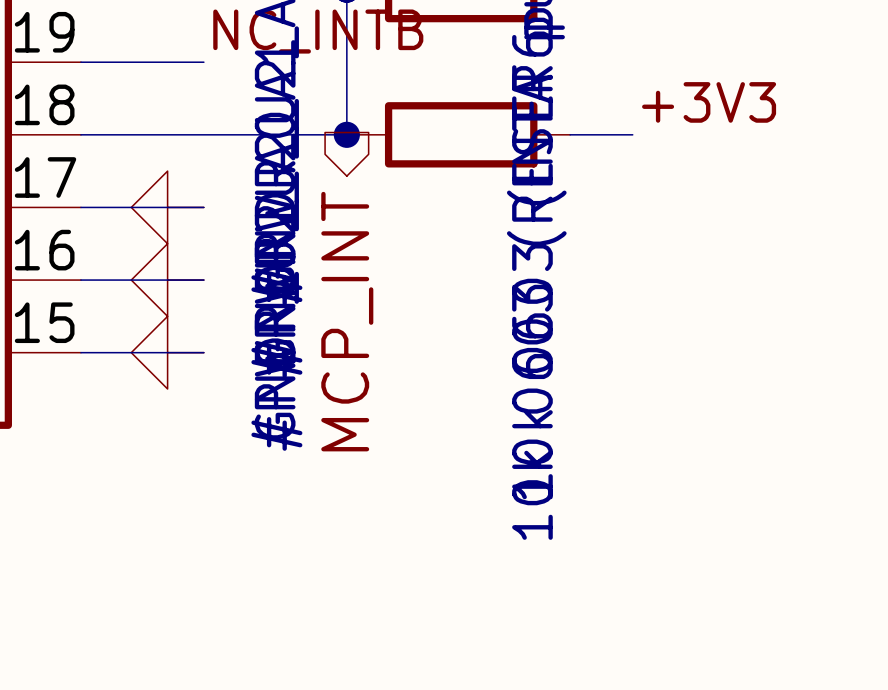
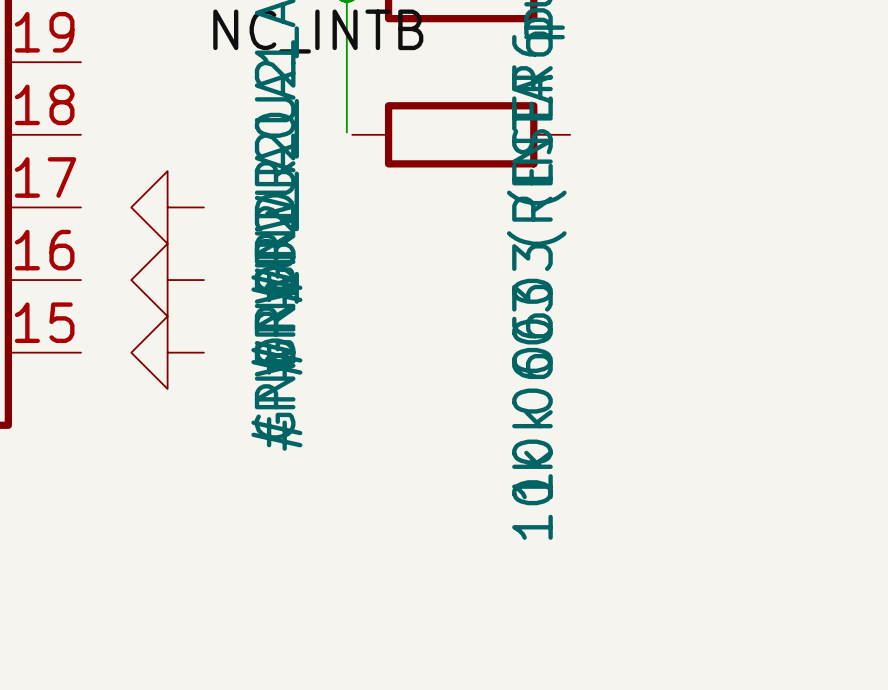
wire: (80, 62) (203, 62) -> none
label: +3V3 (709, 102) -> none
wire: (80, 134) (352, 134) -> none
junction: (346, 134) -> none
wire: (570, 134) (632, 134) -> none
wire: (80, 207) (203, 207) -> none
wire: (80, 280) (203, 280) -> none
hierarchical label: MCP_INT (347, 321) -> none
wire: (80, 352) (203, 352) -> none

